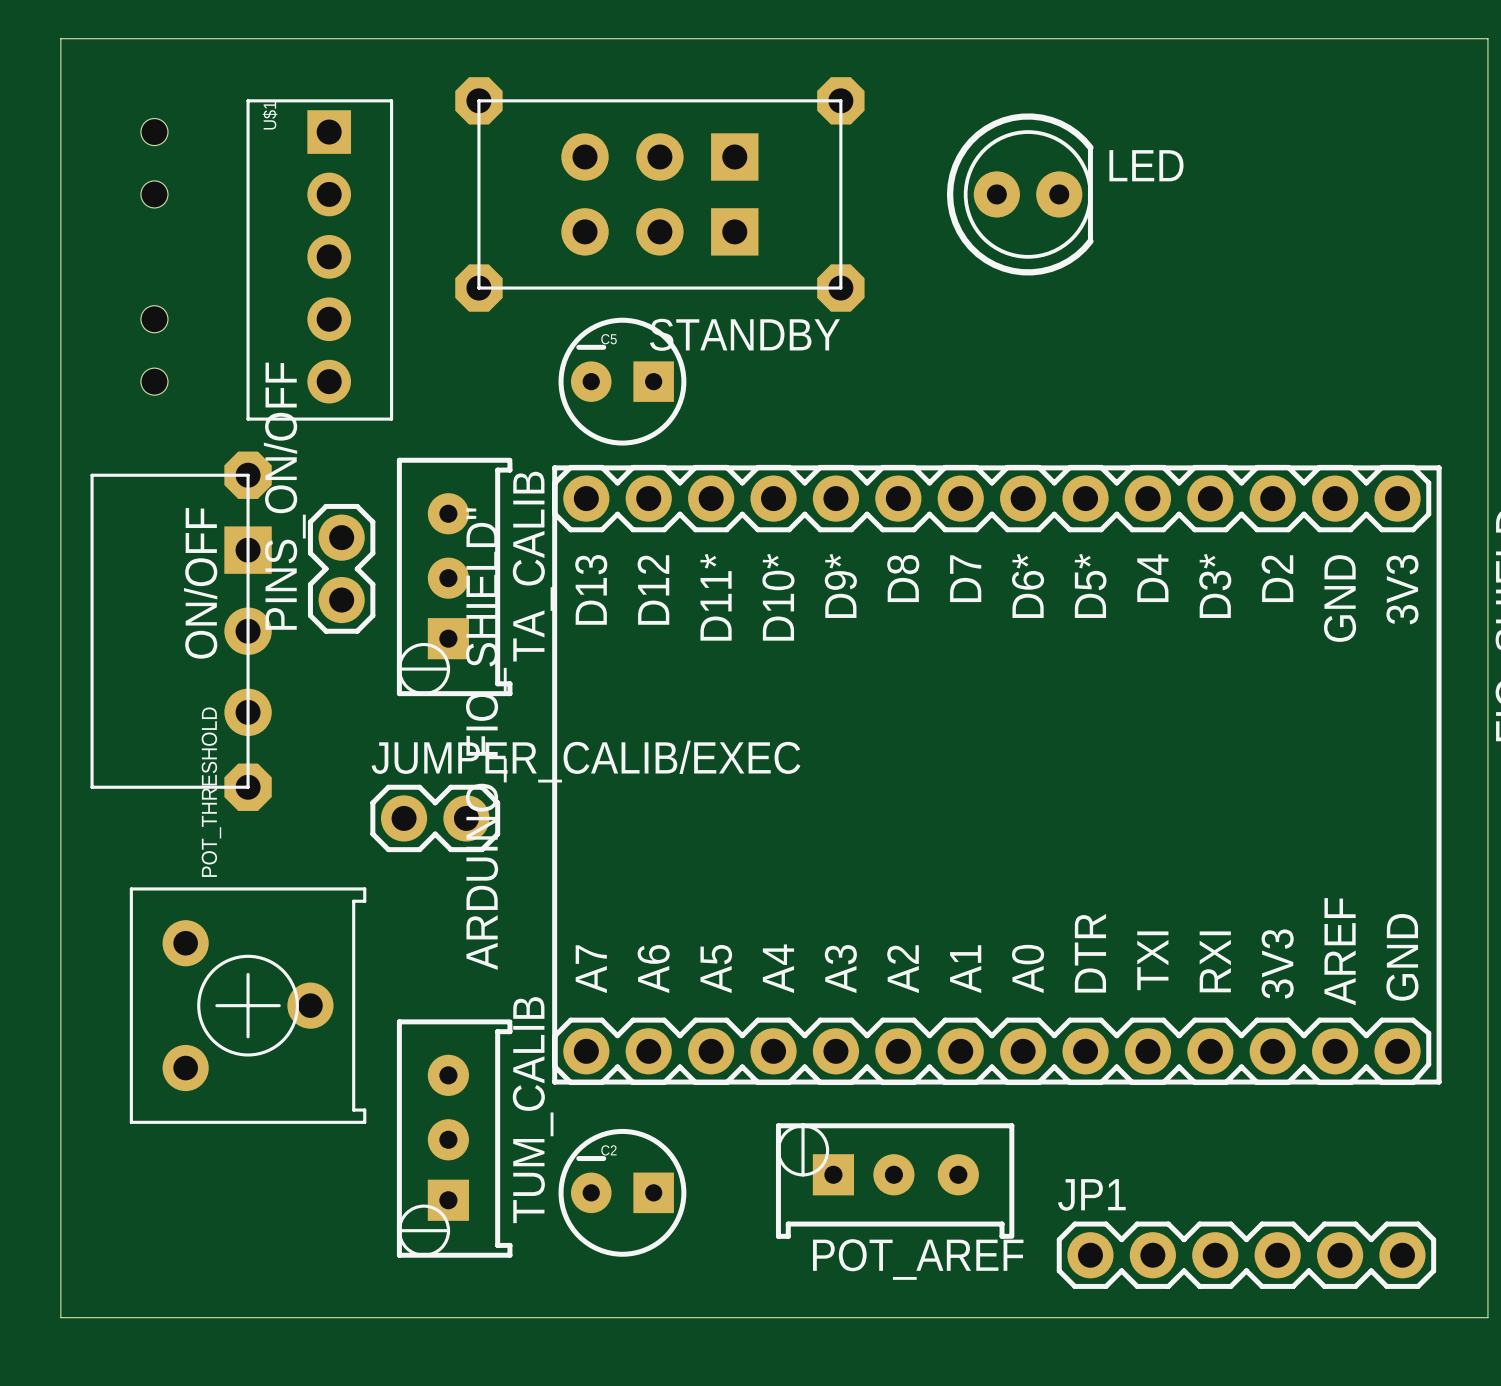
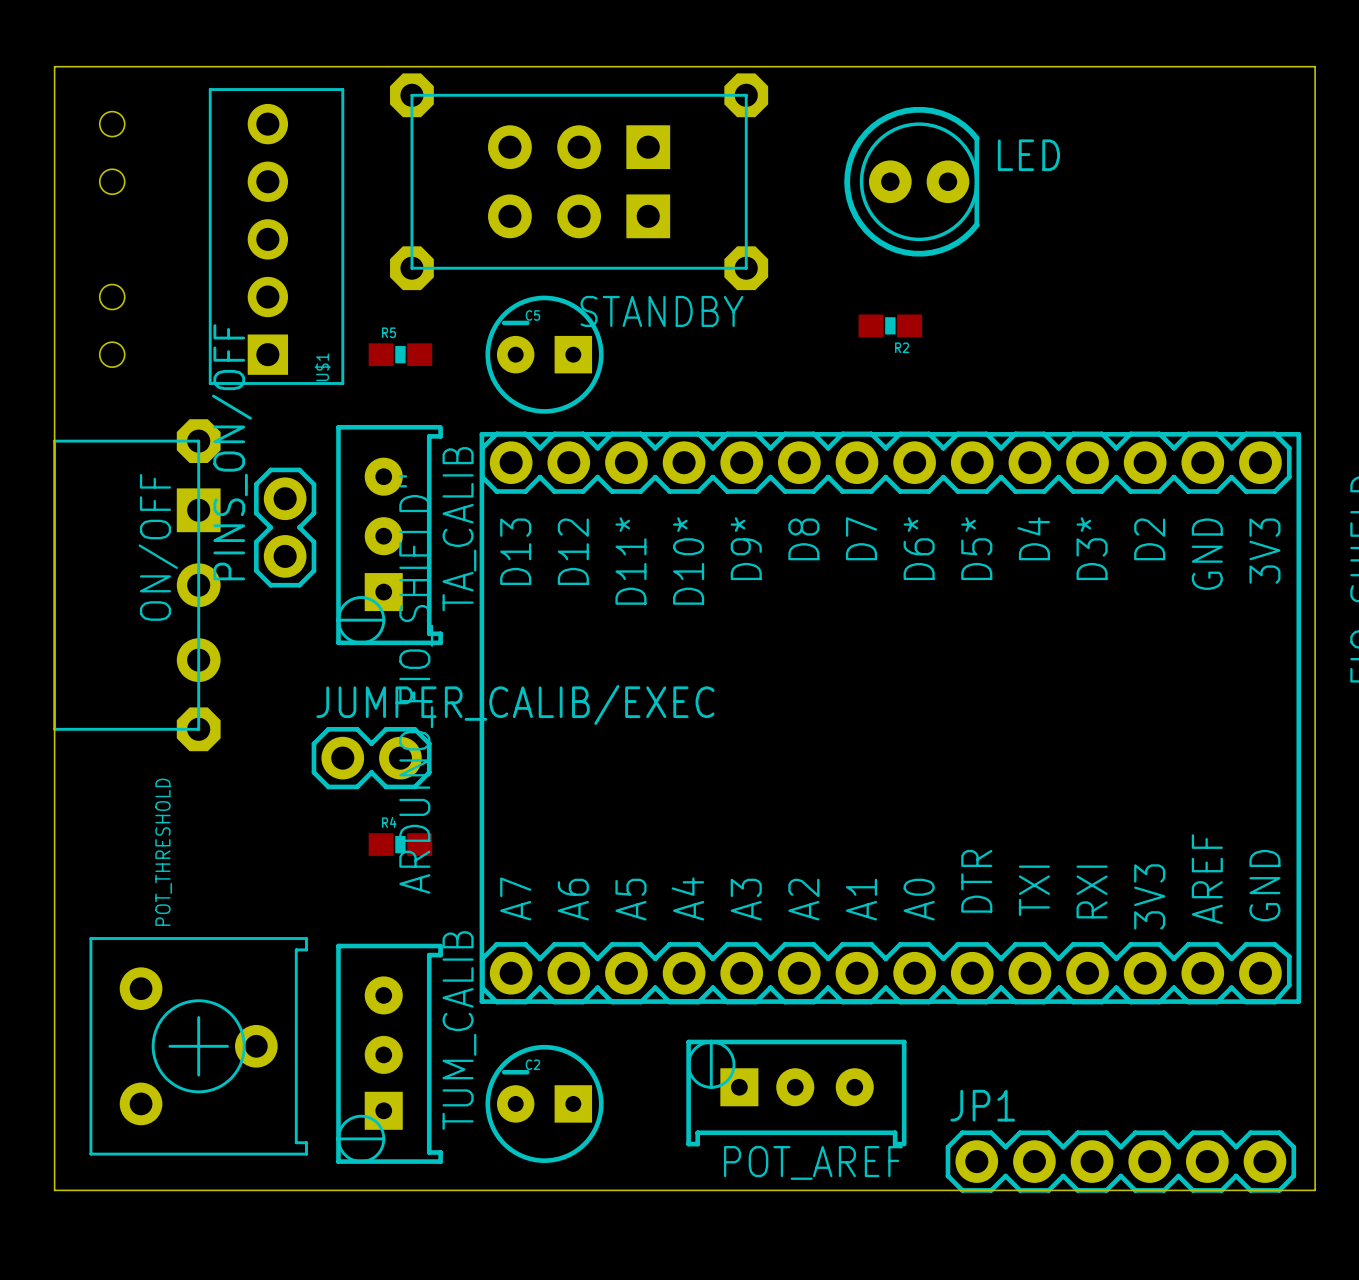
board edge: (60, 38) (1487, 38) (1487, 1317) (60, 1317) (60, 38) -> (54, 66) (54, 1190) (1315, 1190) (1315, 66) (54, 66)
U$1 rotation: 0° (319, 259) -> 180° (276, 236)
R2: none -> (890, 325)
R5: none -> (400, 354)
R4: none -> (400, 844)
POT_THRESHOLD position: (248, 1005) -> (198, 1046)

